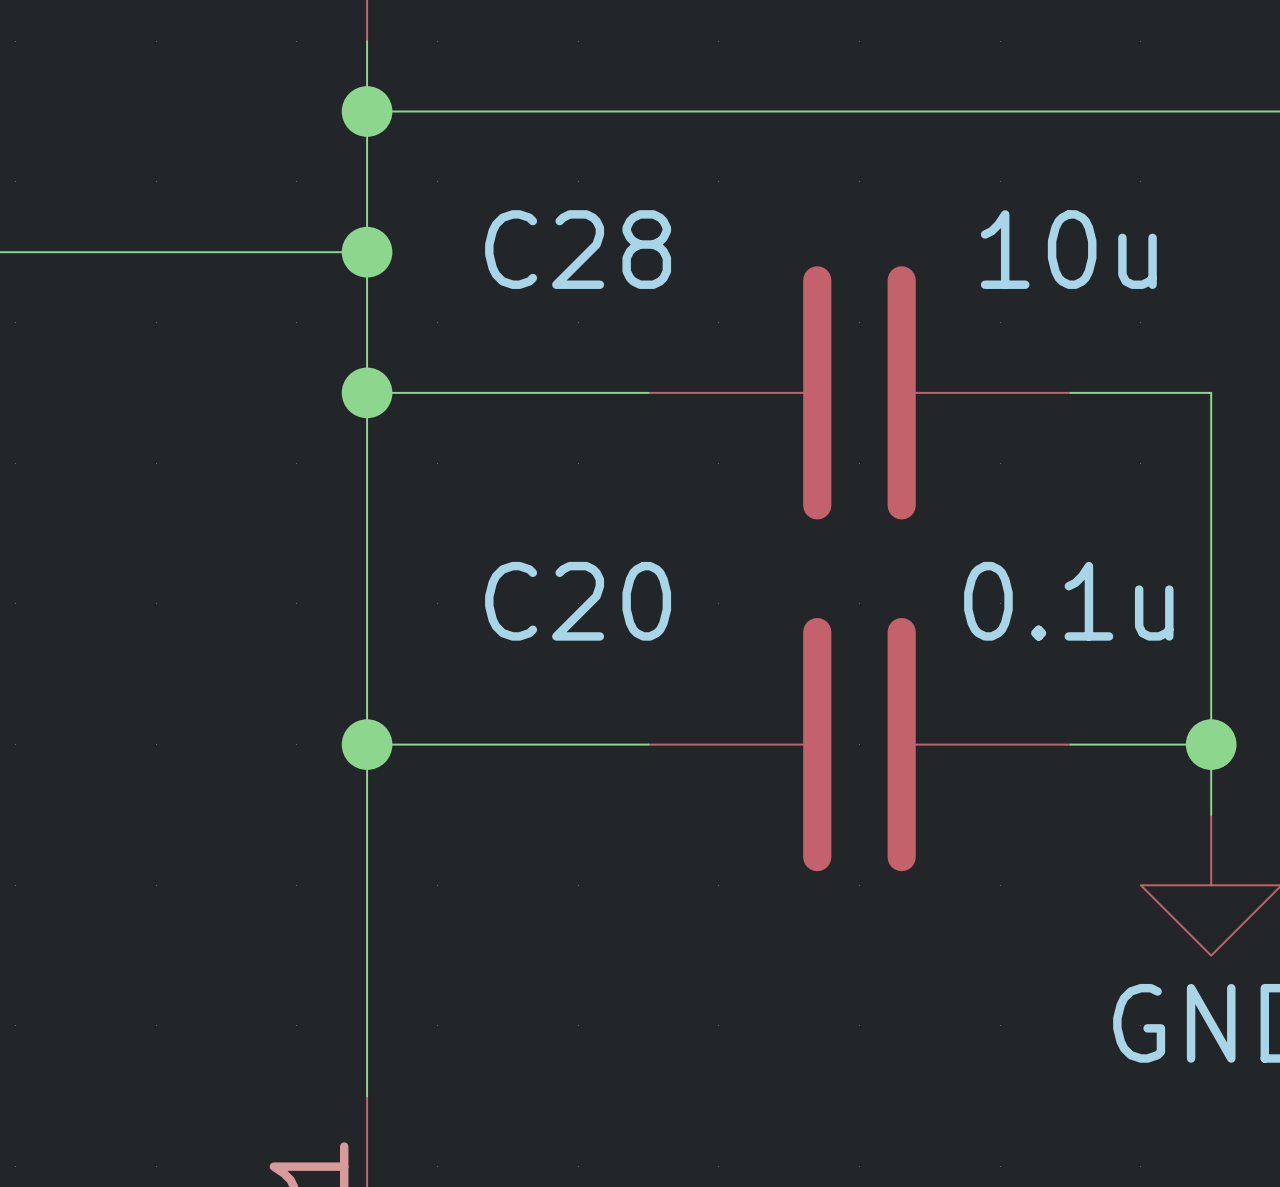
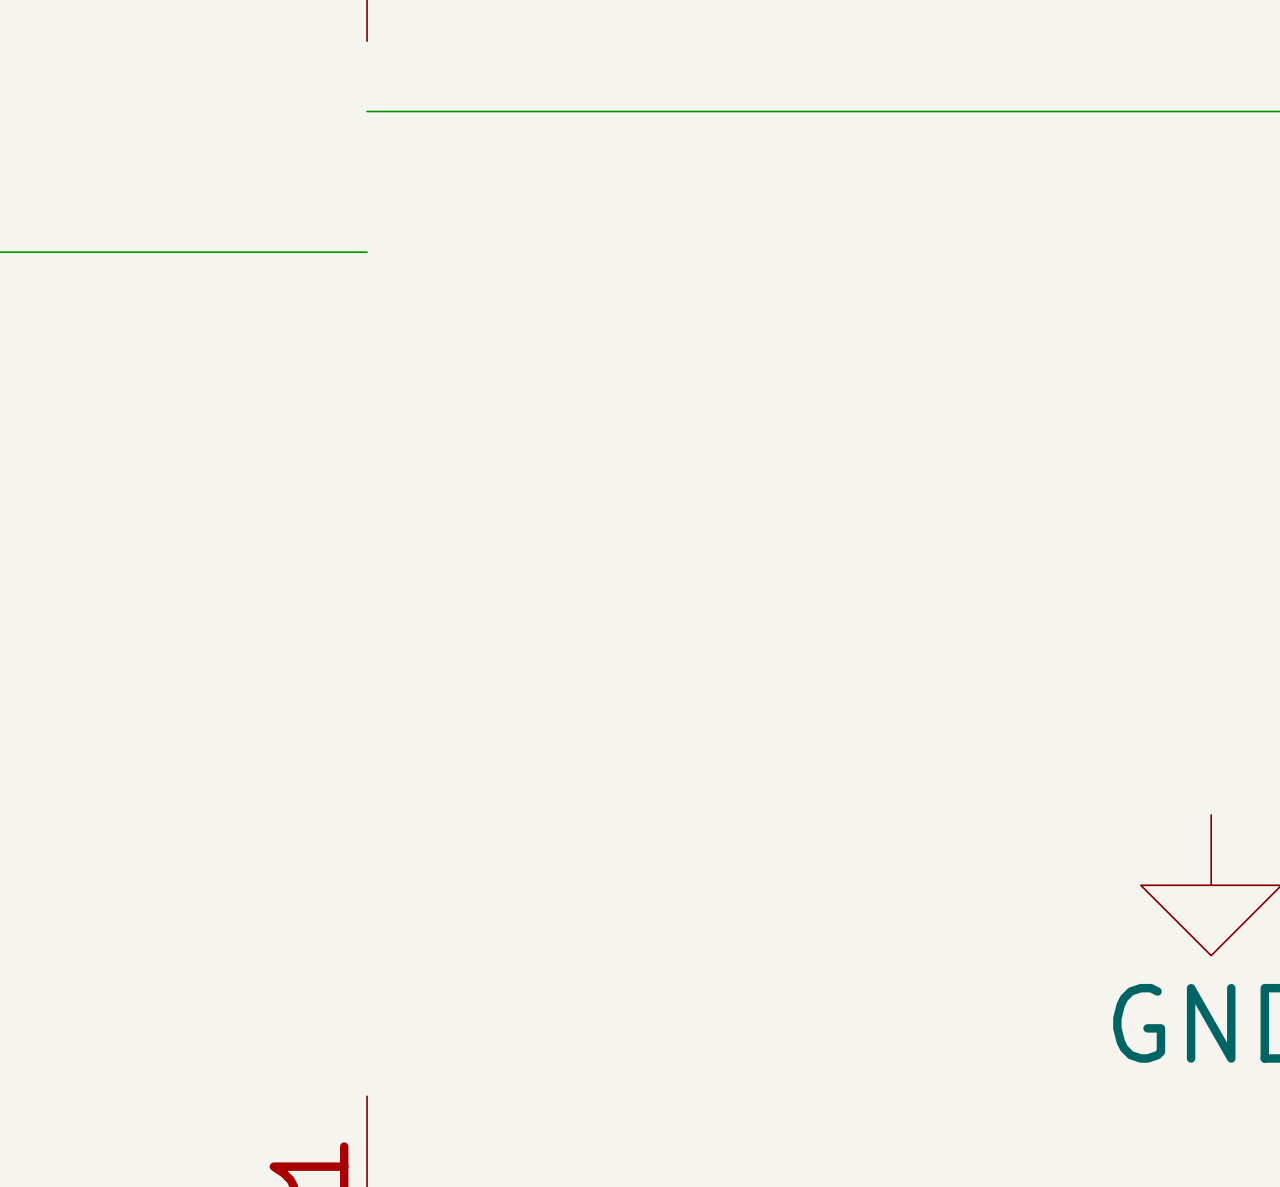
wire: (367, 41) (367, 1096) -> none
junction: (367, 111) -> none
junction: (367, 252) -> none
wire: (367, 392) (648, 392) -> none
junction: (367, 392) -> none
C28: 10u (859, 392) -> none
wire: (1070, 392) (1211, 392) (1211, 814) -> none
wire: (367, 744) (648, 744) -> none
junction: (367, 744) -> none
C20: 0.1u (859, 744) -> none
wire: (1070, 744) (1211, 744) -> none
junction: (1211, 744) -> none

